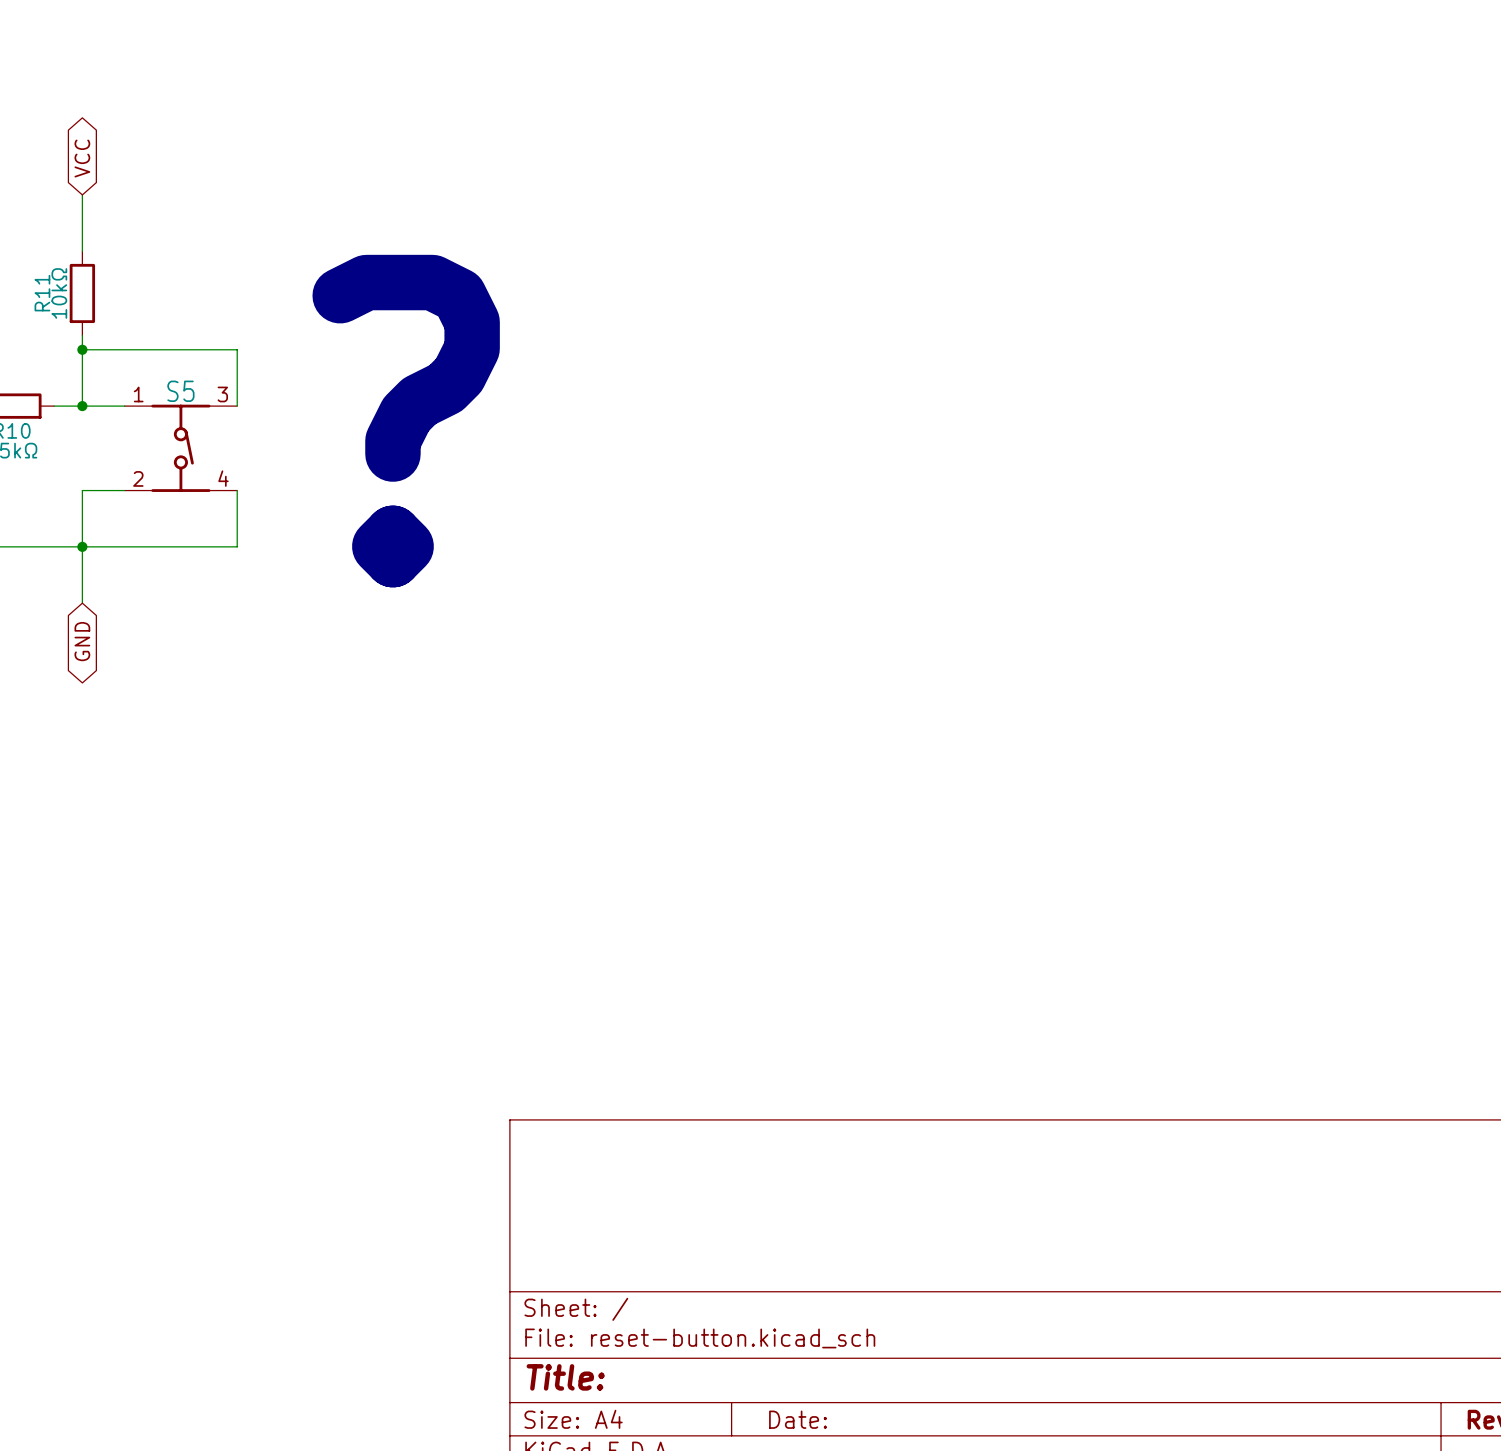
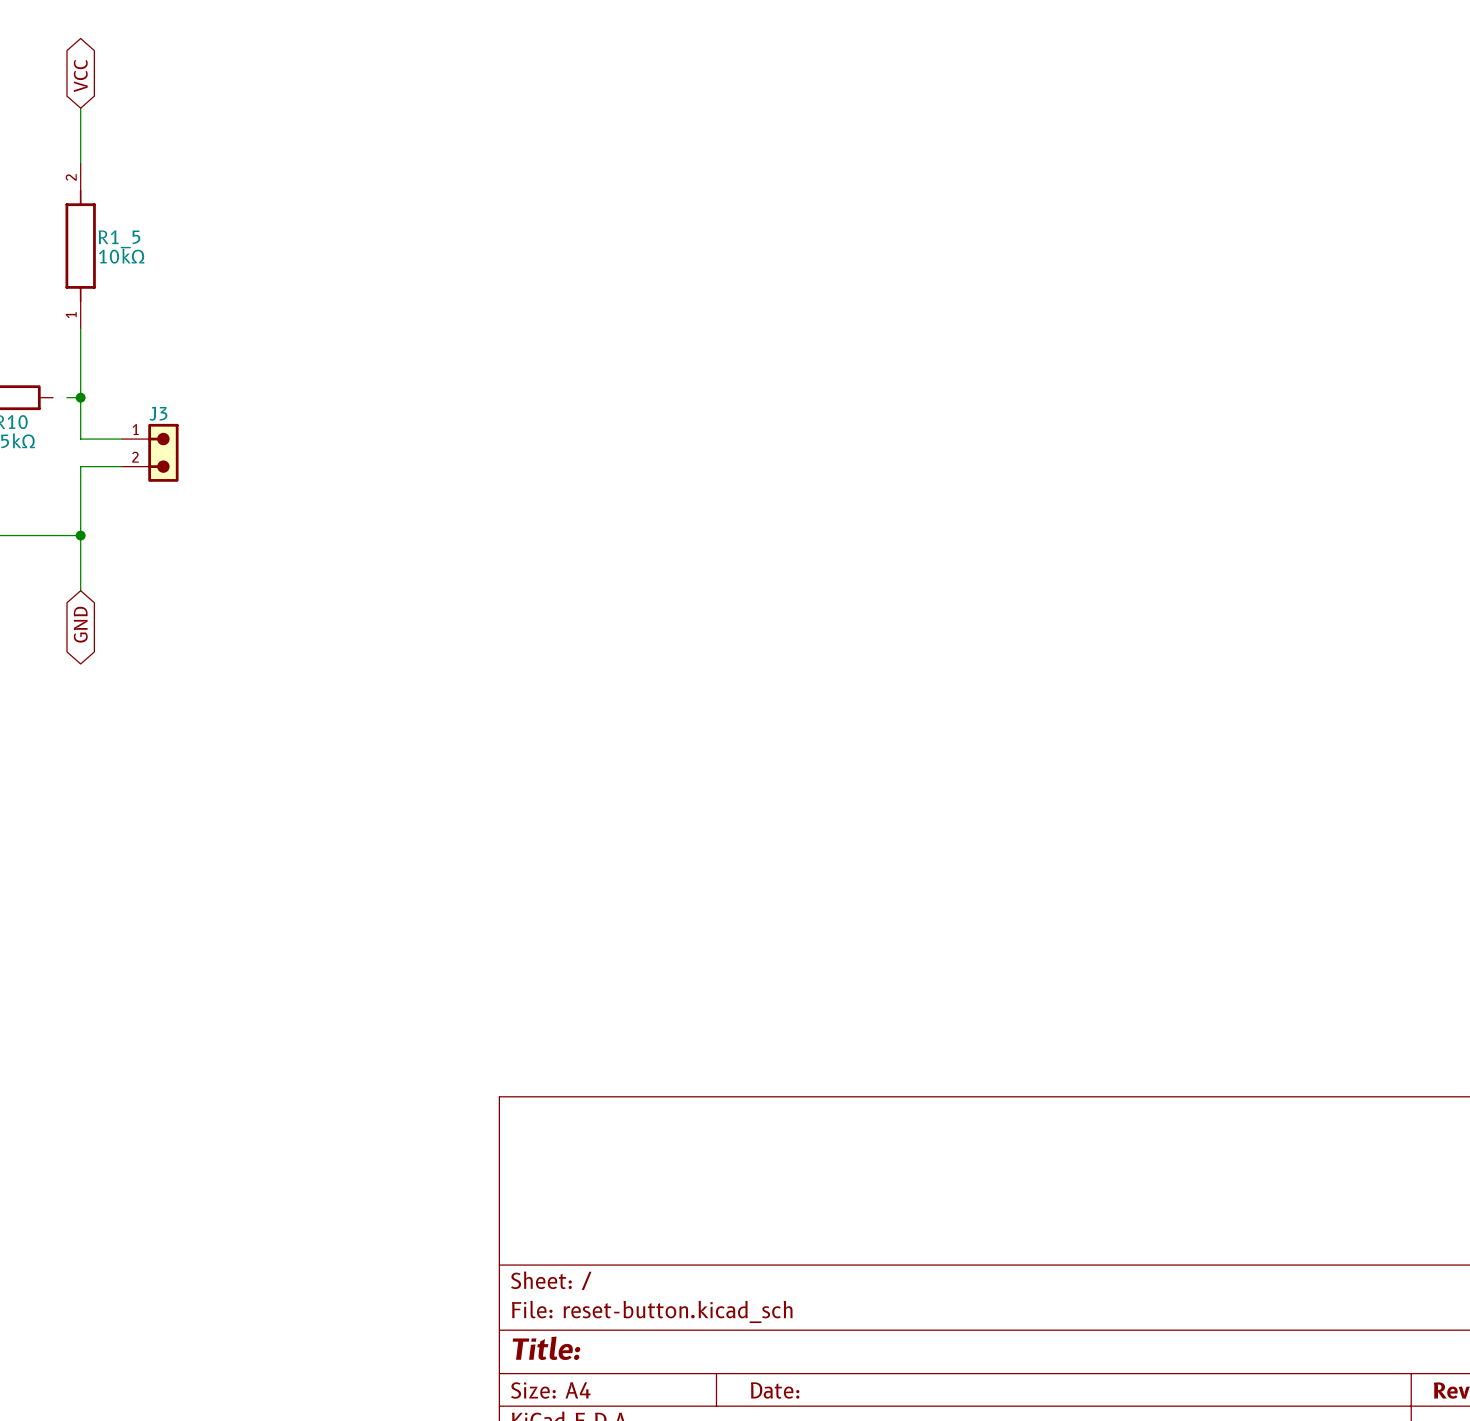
global label position: VCC (82, 158) -> VCC (80, 75)
wire: (82, 194) (82, 251) -> (80, 108) (80, 163)
R1_5: none -> 10kΩ (80, 246)
R11: 10kΩ (82, 293) -> none
wire: (82, 349) (237, 349) (237, 406) -> none
junction: (82, 349) -> none
wire: (54, 406) (68, 406) -> none
wire: (82, 406) (124, 406) -> (80, 397) (80, 439) (122, 439)
text: ? (406, 421) -> none
S5: (180, 448) -> none
J3: none -> (150, 452)
wire: (82, 490) (124, 490) -> (80, 480) (80, 466) (122, 466)
wire: (237, 490) (237, 546) (82, 546) -> none

